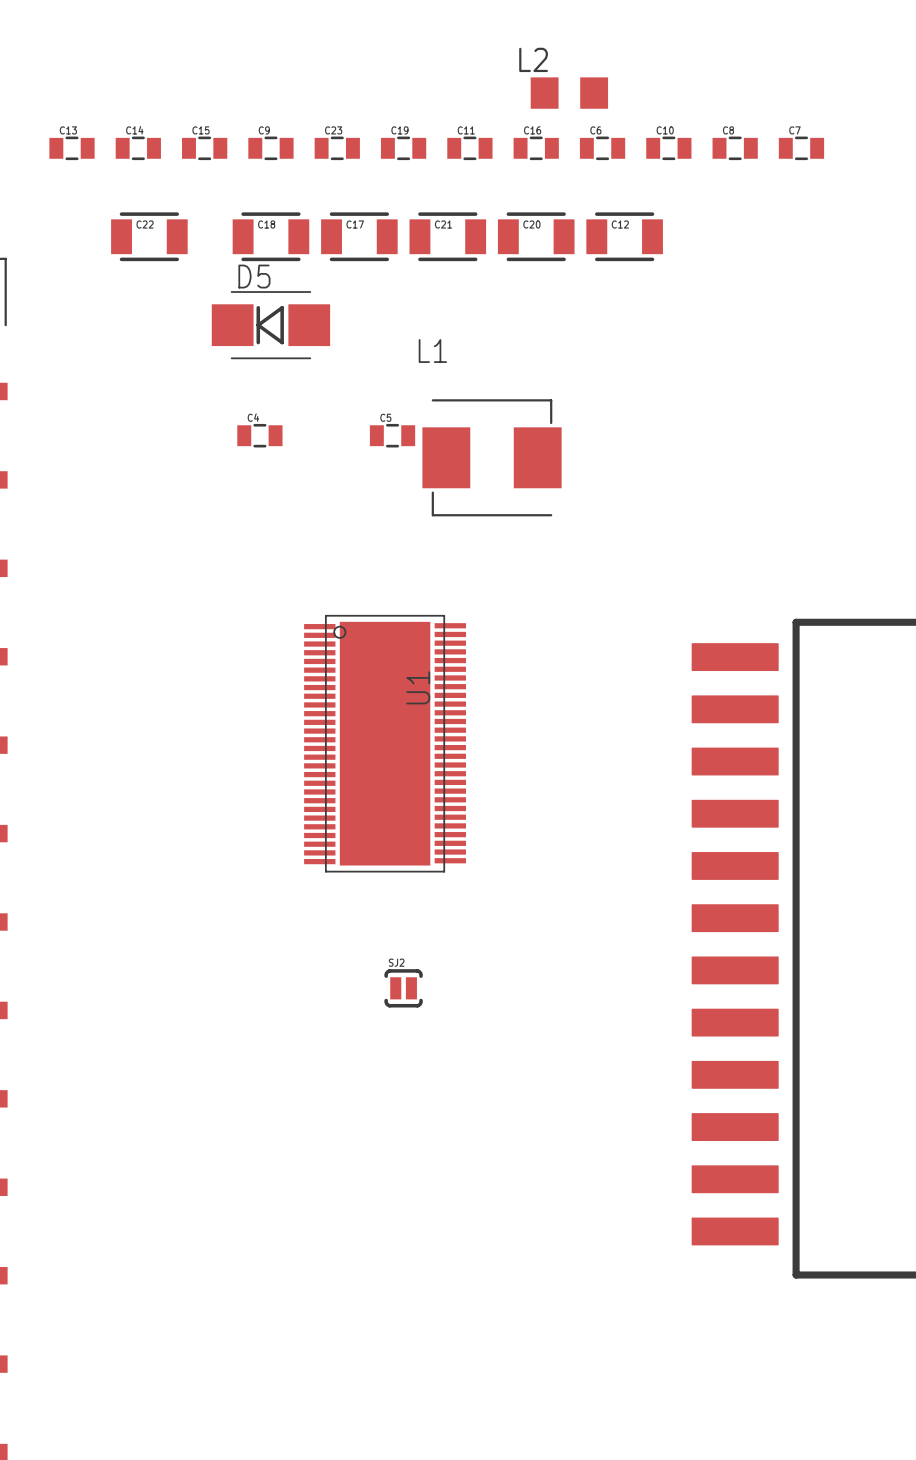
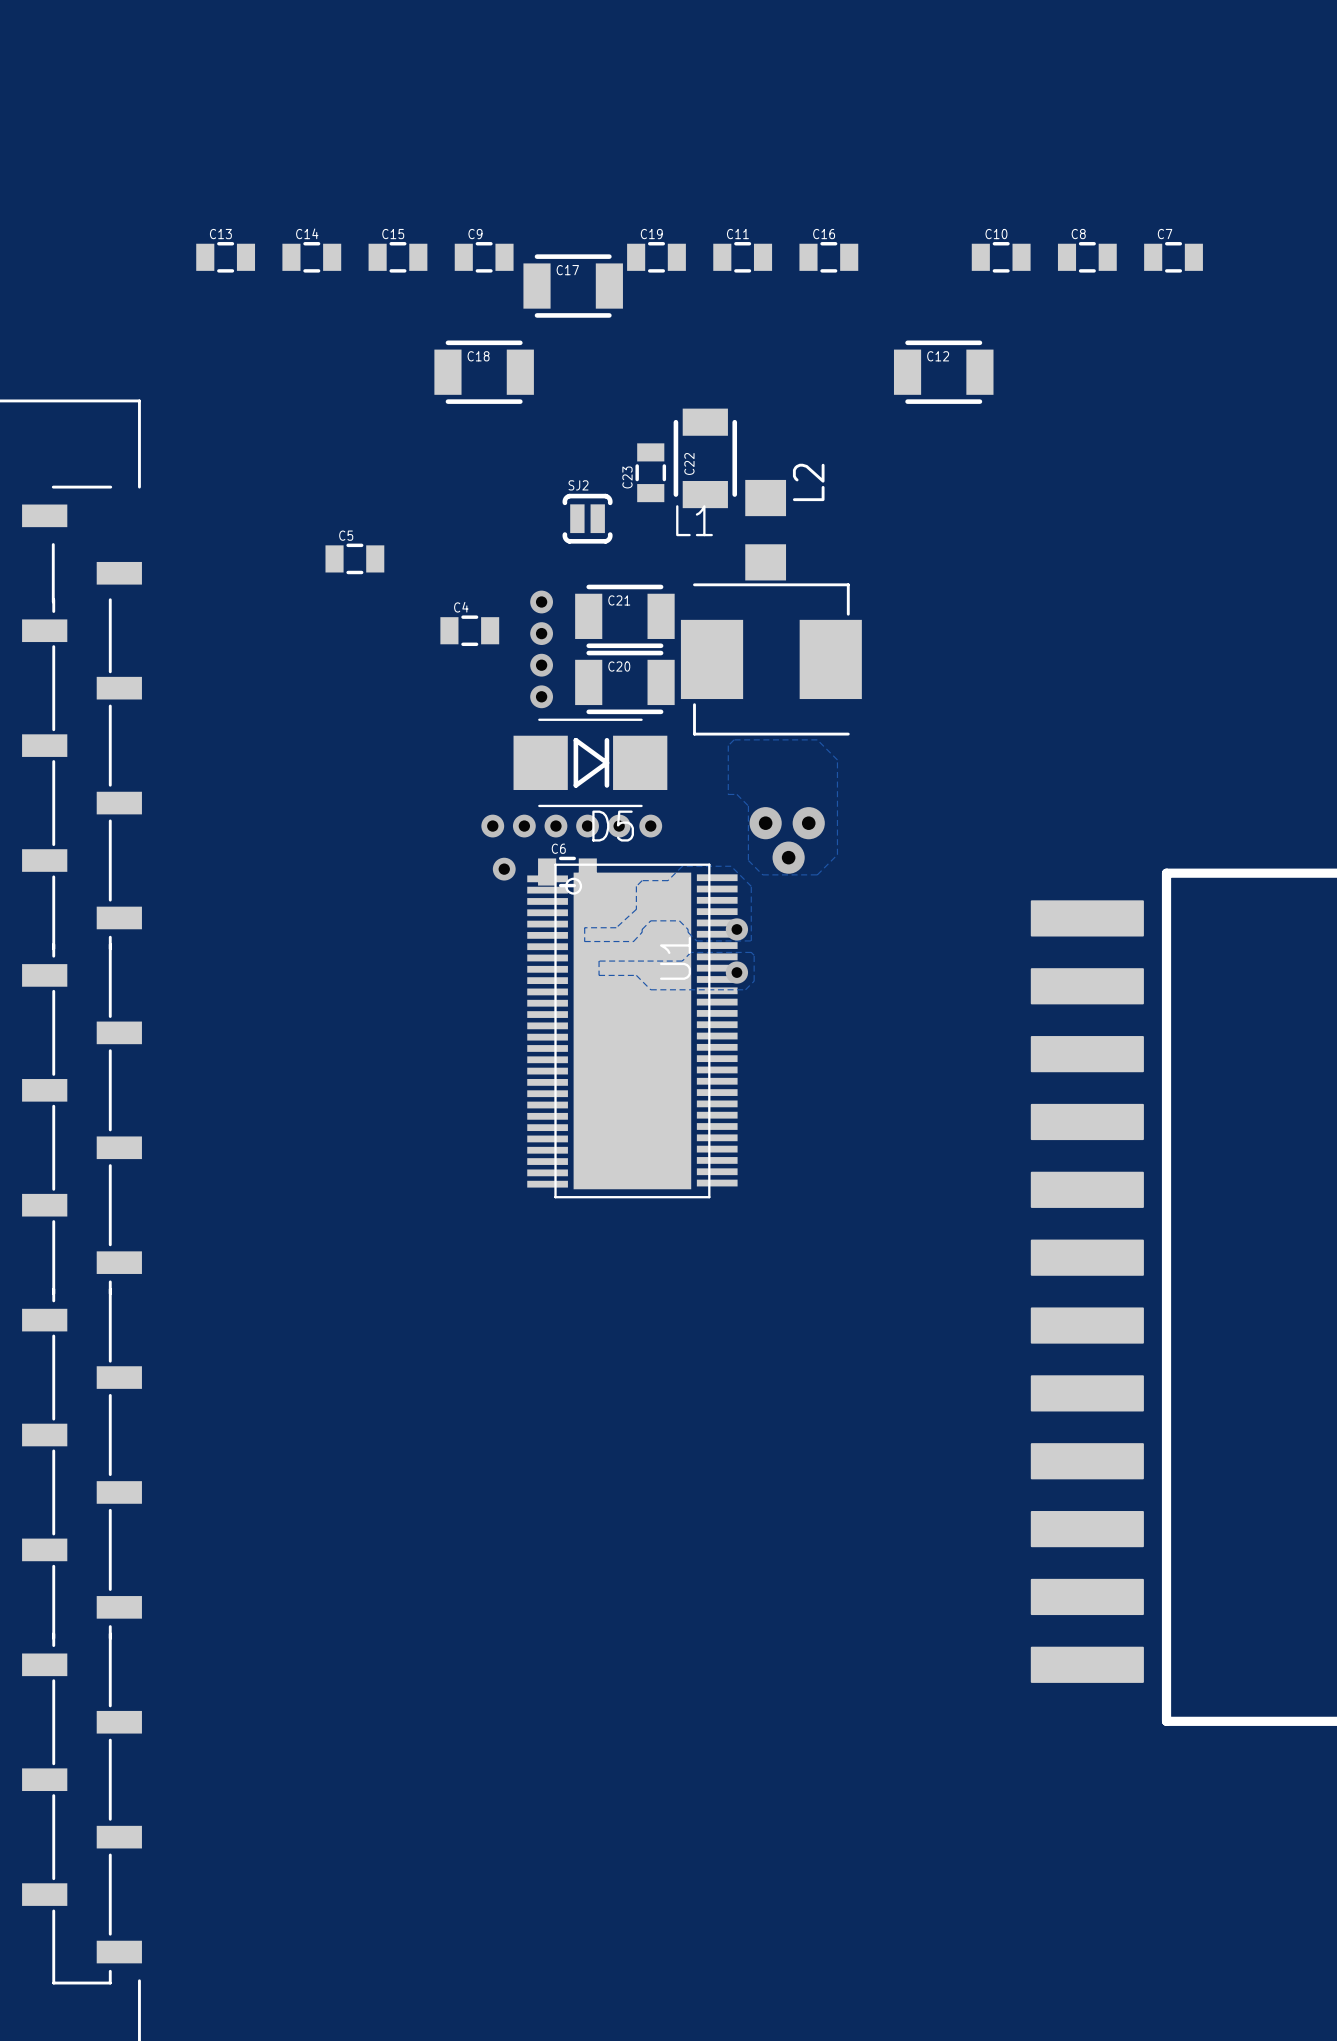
L2 rotation: 0° (569, 93) -> 90° clockwise (765, 530)
L2 position: (569, 93) -> (765, 530)
C23 rotation: 0° (337, 148) -> 90° clockwise (650, 472)
C23 position: (337, 148) -> (650, 472)
C6 position: (602, 148) -> (567, 872)
C22 rotation: 0° (149, 236) -> 90° clockwise (705, 458)
C22 position: (149, 236) -> (705, 458)
C17 position: (359, 236) -> (573, 286)
C21 position: (447, 236) -> (624, 616)
C20 position: (536, 236) -> (624, 682)
D5 rotation: 0° (270, 325) -> 180° (590, 762)
D5 position: (270, 325) -> (590, 762)
via: none -> (541, 602)
C5 position: (392, 435) -> (354, 558)
via: none -> (541, 633)
via: none -> (541, 665)
via: none -> (541, 696)
zone outline: none -> (734, 739) (817, 739) (837, 759) (837, 854) (817, 874) (762, 874) (748, 860) (748, 805) (736, 794) (728, 794) (728, 745) (734, 739)
via: none -> (765, 823)
via: none -> (808, 823)
via: none -> (492, 826)
via: none -> (524, 826)
via: none -> (555, 826)
via: none -> (587, 826)
via: none -> (619, 826)
via: none -> (650, 826)
via: none -> (788, 857)
zone outline: none -> (682, 866) (731, 866) (751, 886) (751, 940) (696, 940) (679, 920) (650, 920) (633, 941) (584, 941) (584, 927) (616, 927) (636, 909) (636, 886) (642, 880) (667, 880) (682, 866)
via: none -> (504, 869)
via: none -> (736, 929)
zone outline: none -> (690, 952) (751, 952) (754, 955) (754, 981) (745, 989) (650, 989) (636, 975) (599, 975) (599, 961) (682, 961) (690, 952)
via: none -> (736, 972)
SJ2 position: (403, 988) -> (587, 518)

